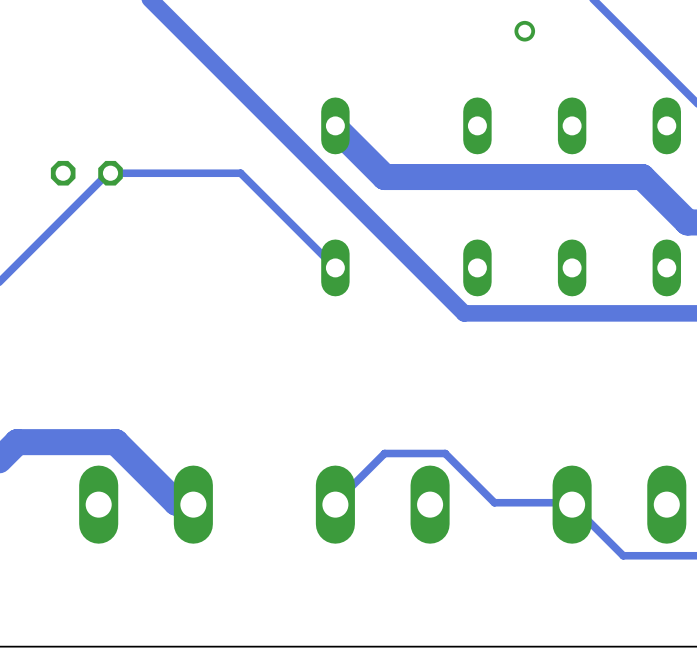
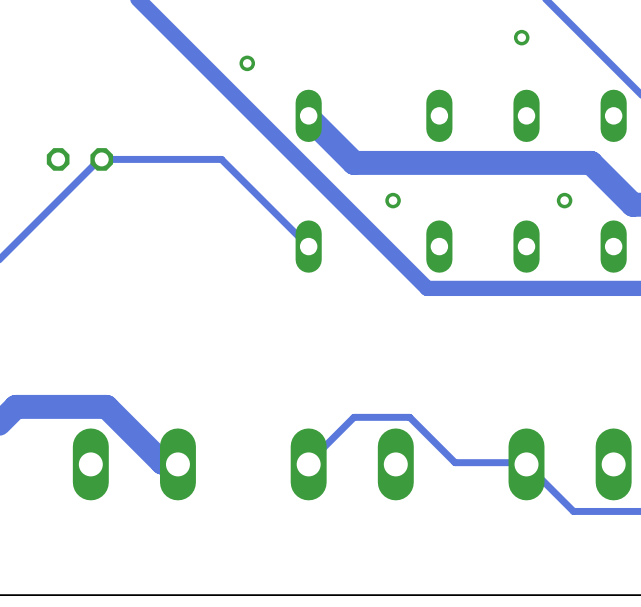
via: (524, 31) -> none
via: none -> (521, 37)
via: none -> (247, 63)
via: none -> (393, 200)
via: none -> (564, 200)

